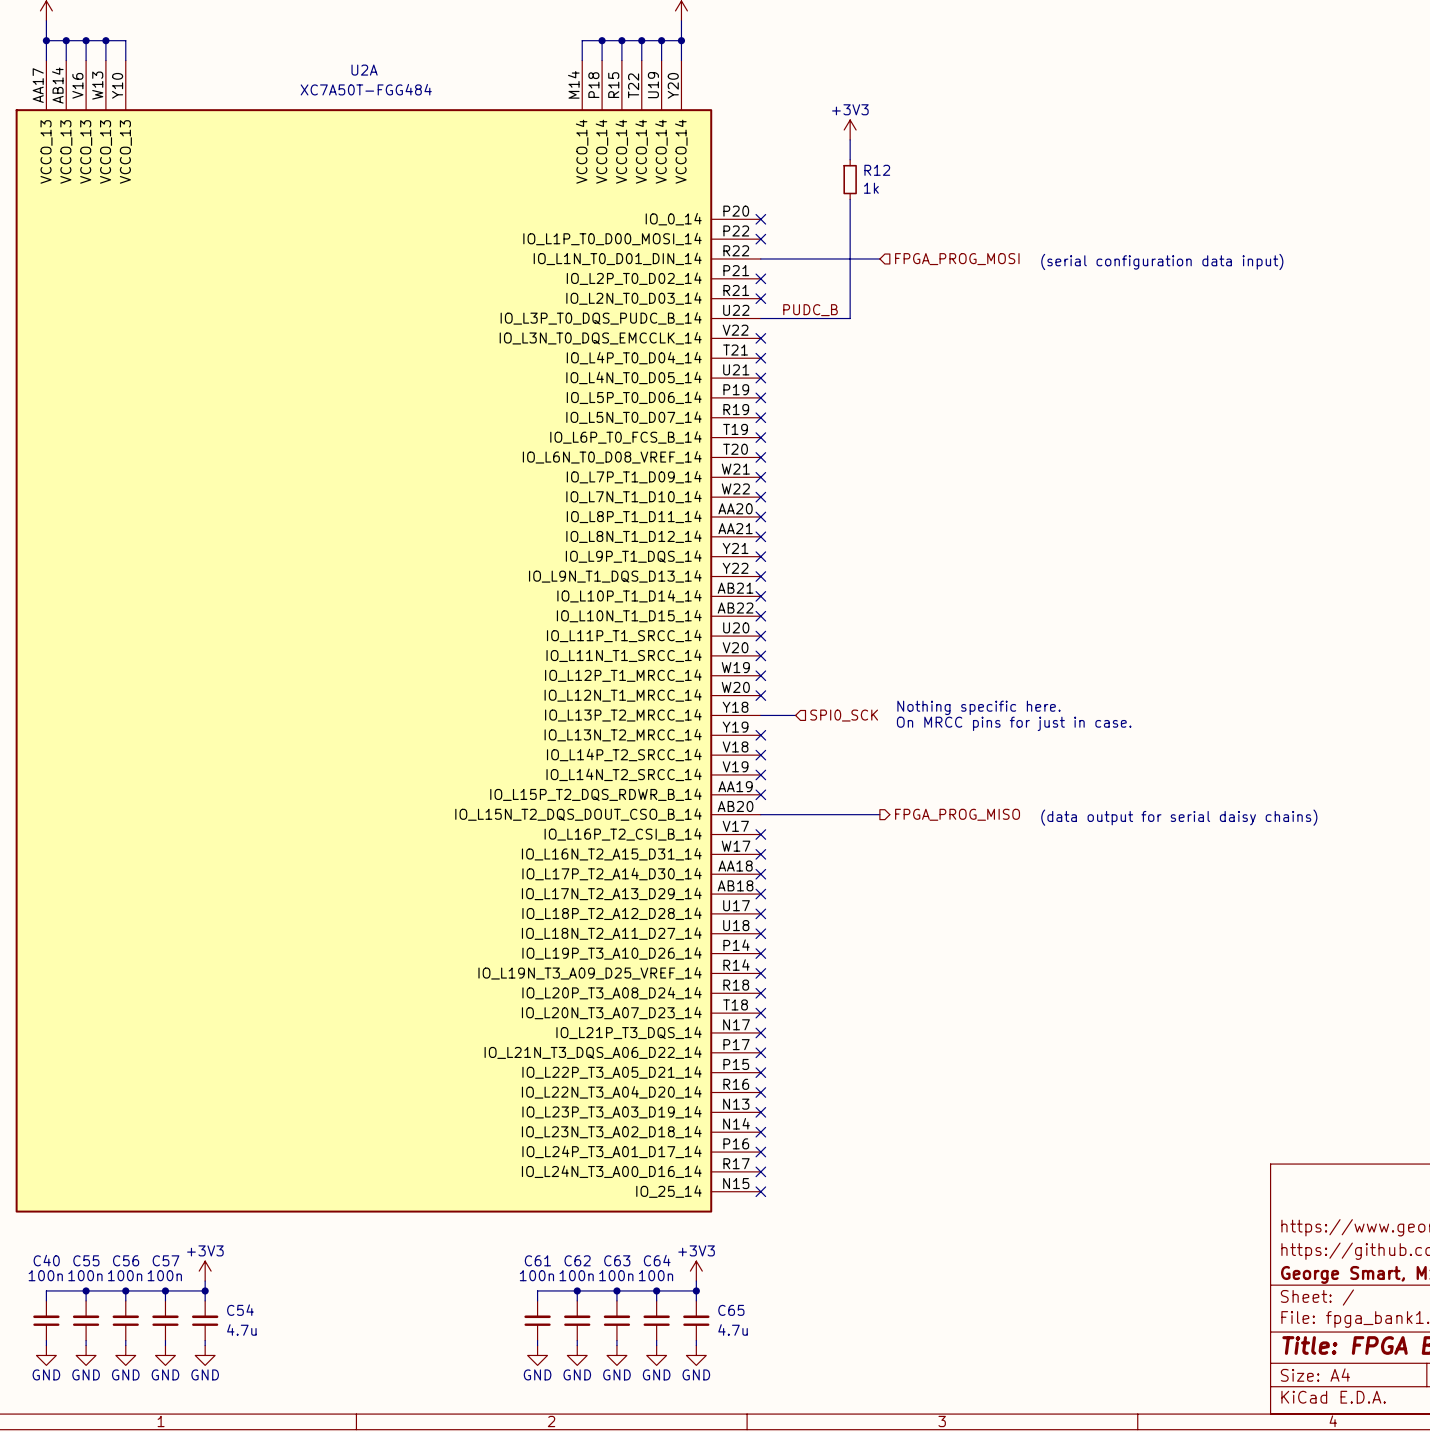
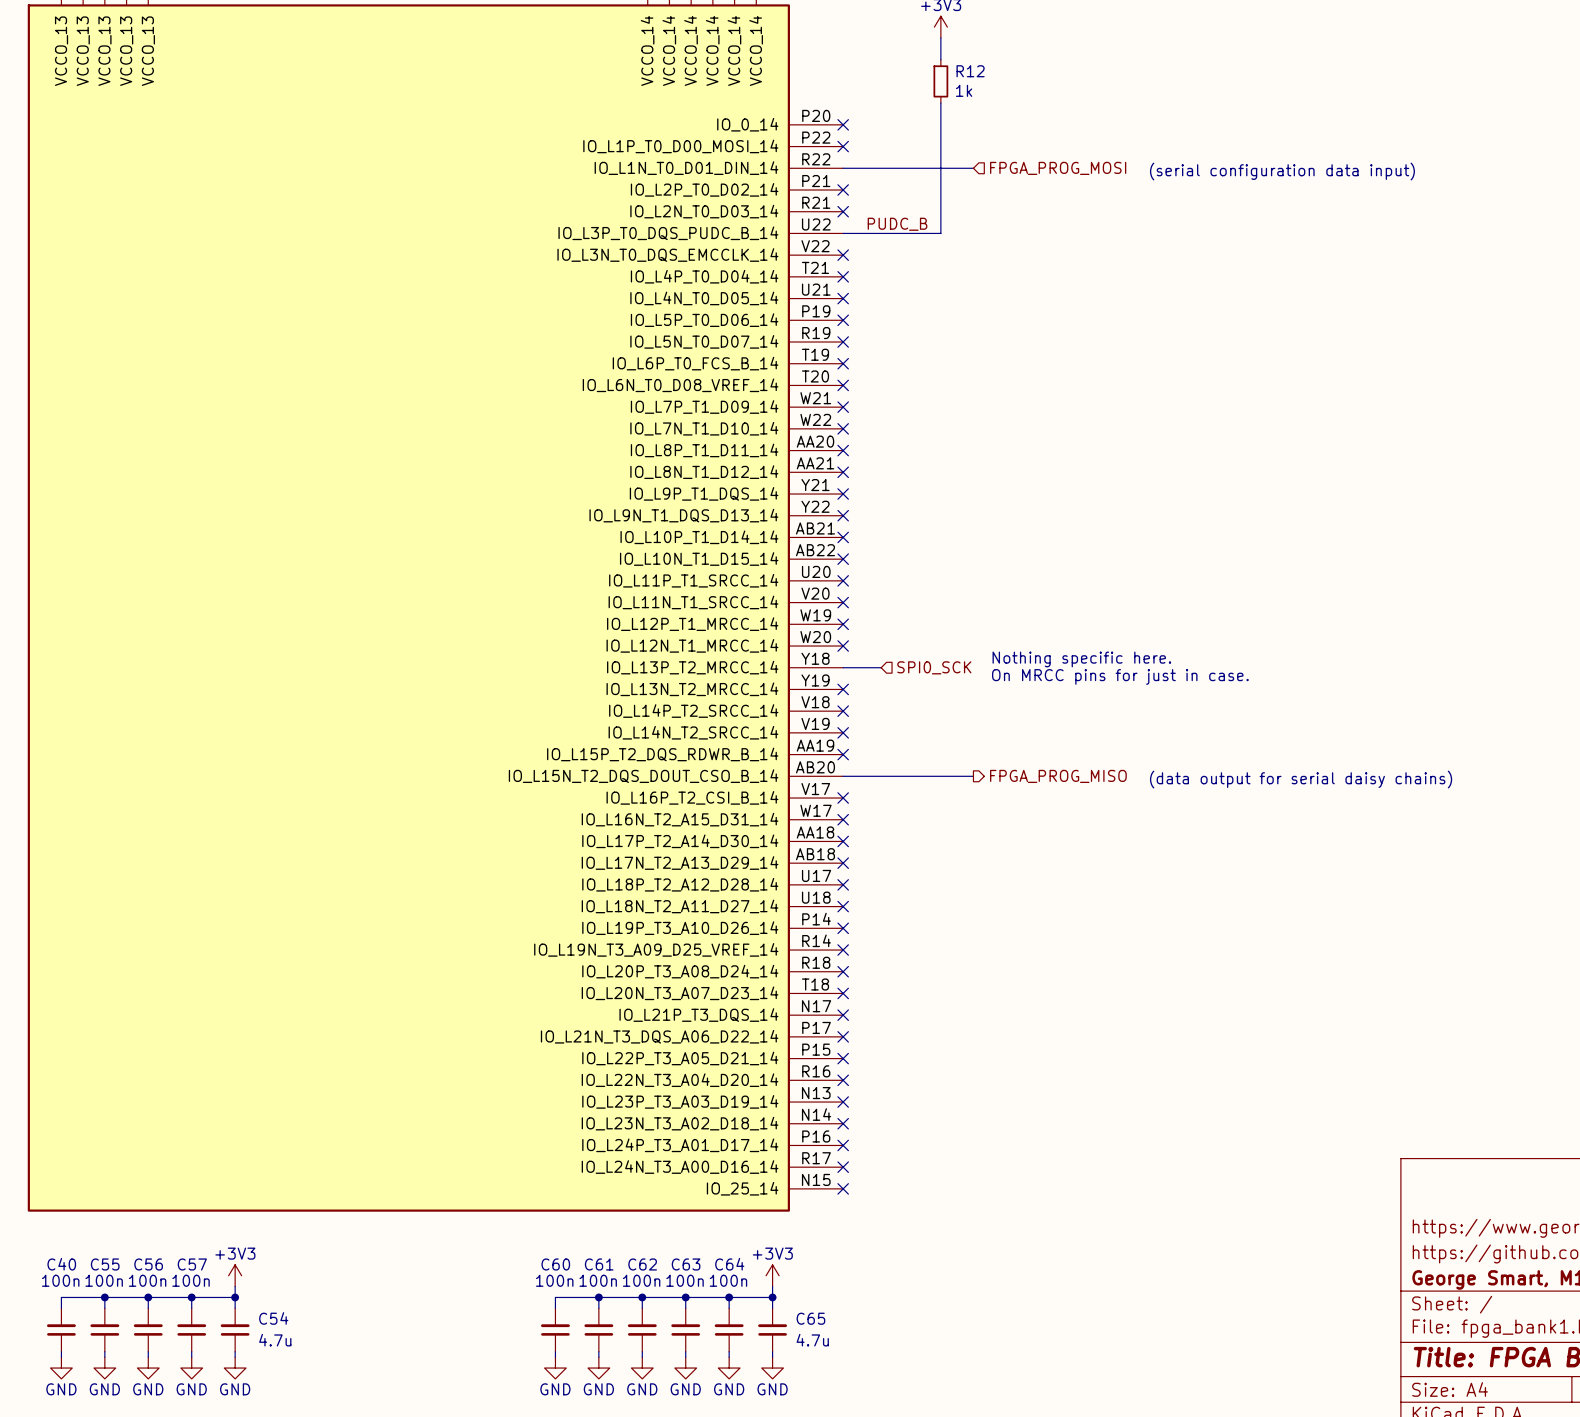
wire: none -> (598, 1297) (555, 1297) (555, 1308)
junction: none -> (598, 1297)
C60: none -> 100n (555, 1330)
wire: none -> (555, 1351) (555, 1357)
power symbol: none -> GND (555, 1368)

